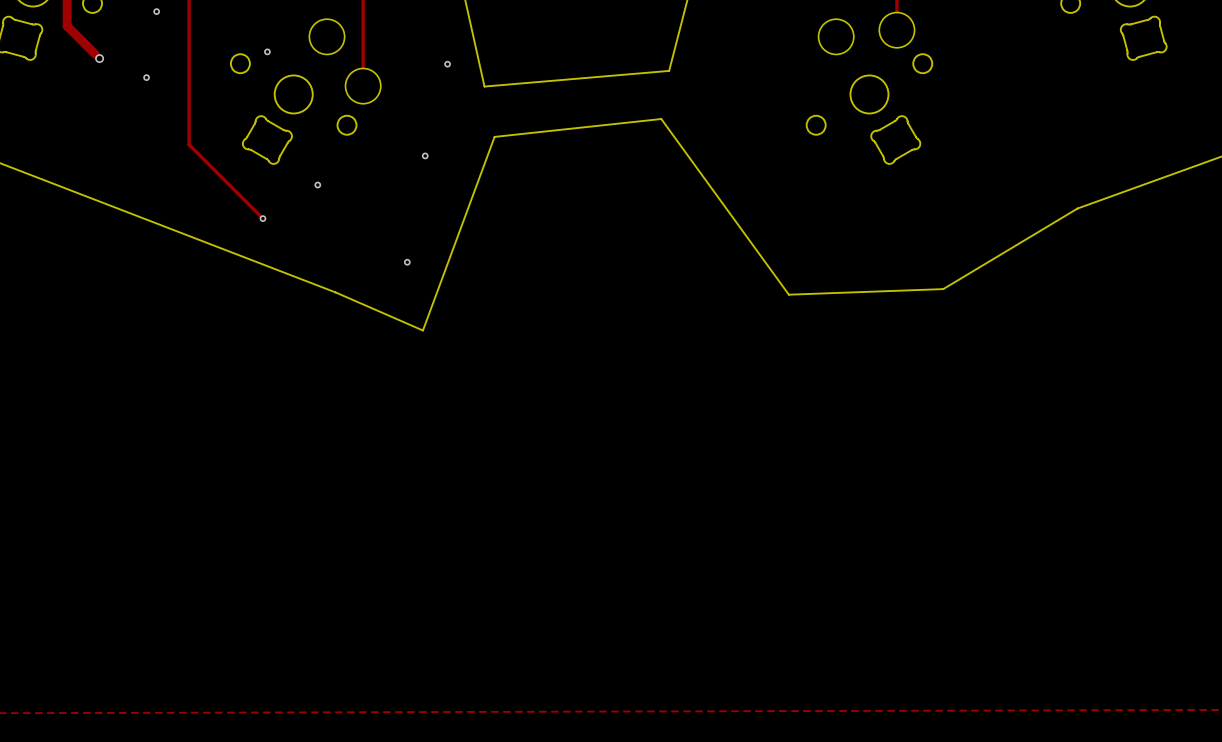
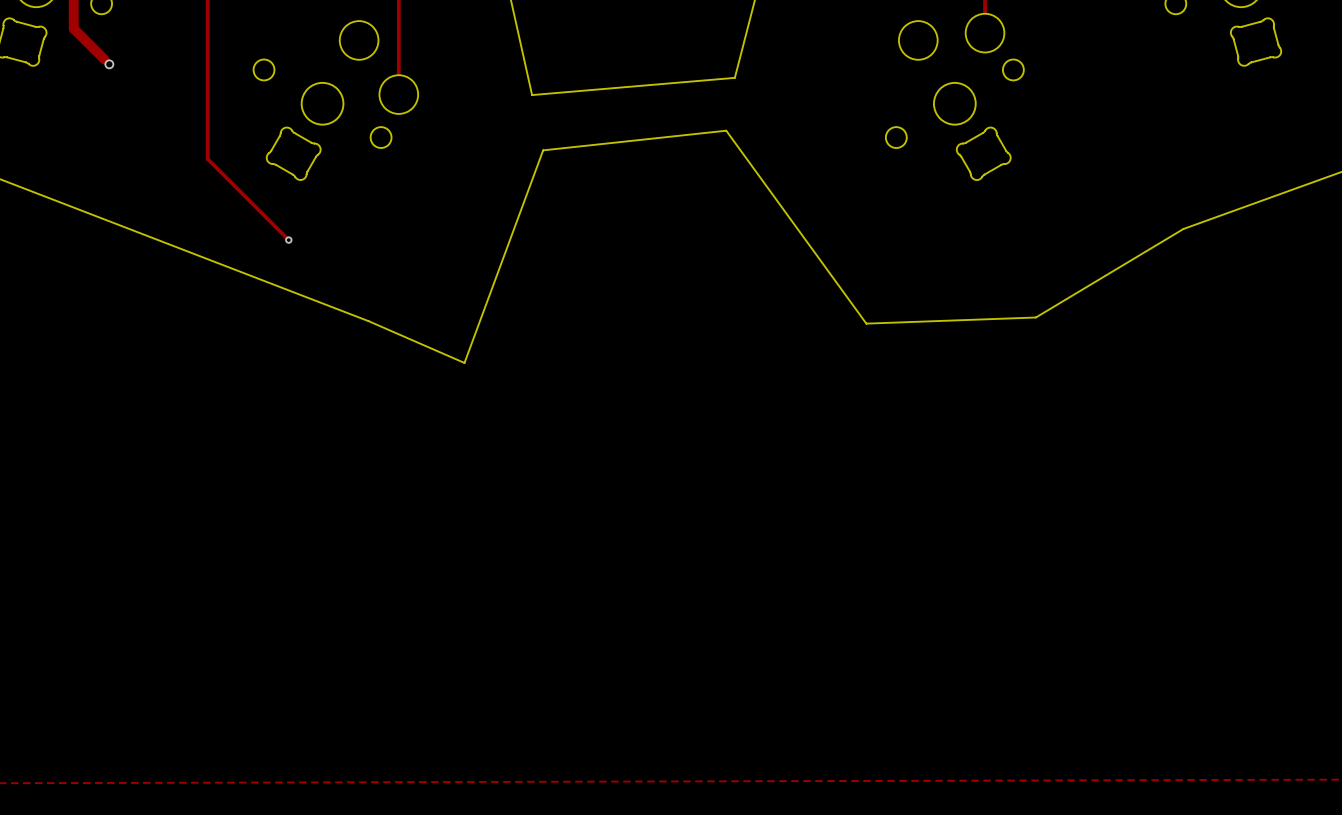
via: (156, 11) -> none
via: (267, 51) -> none
via: (447, 64) -> none
via: (146, 77) -> none
via: (425, 155) -> none
via: (317, 185) -> none
via: (407, 262) -> none

